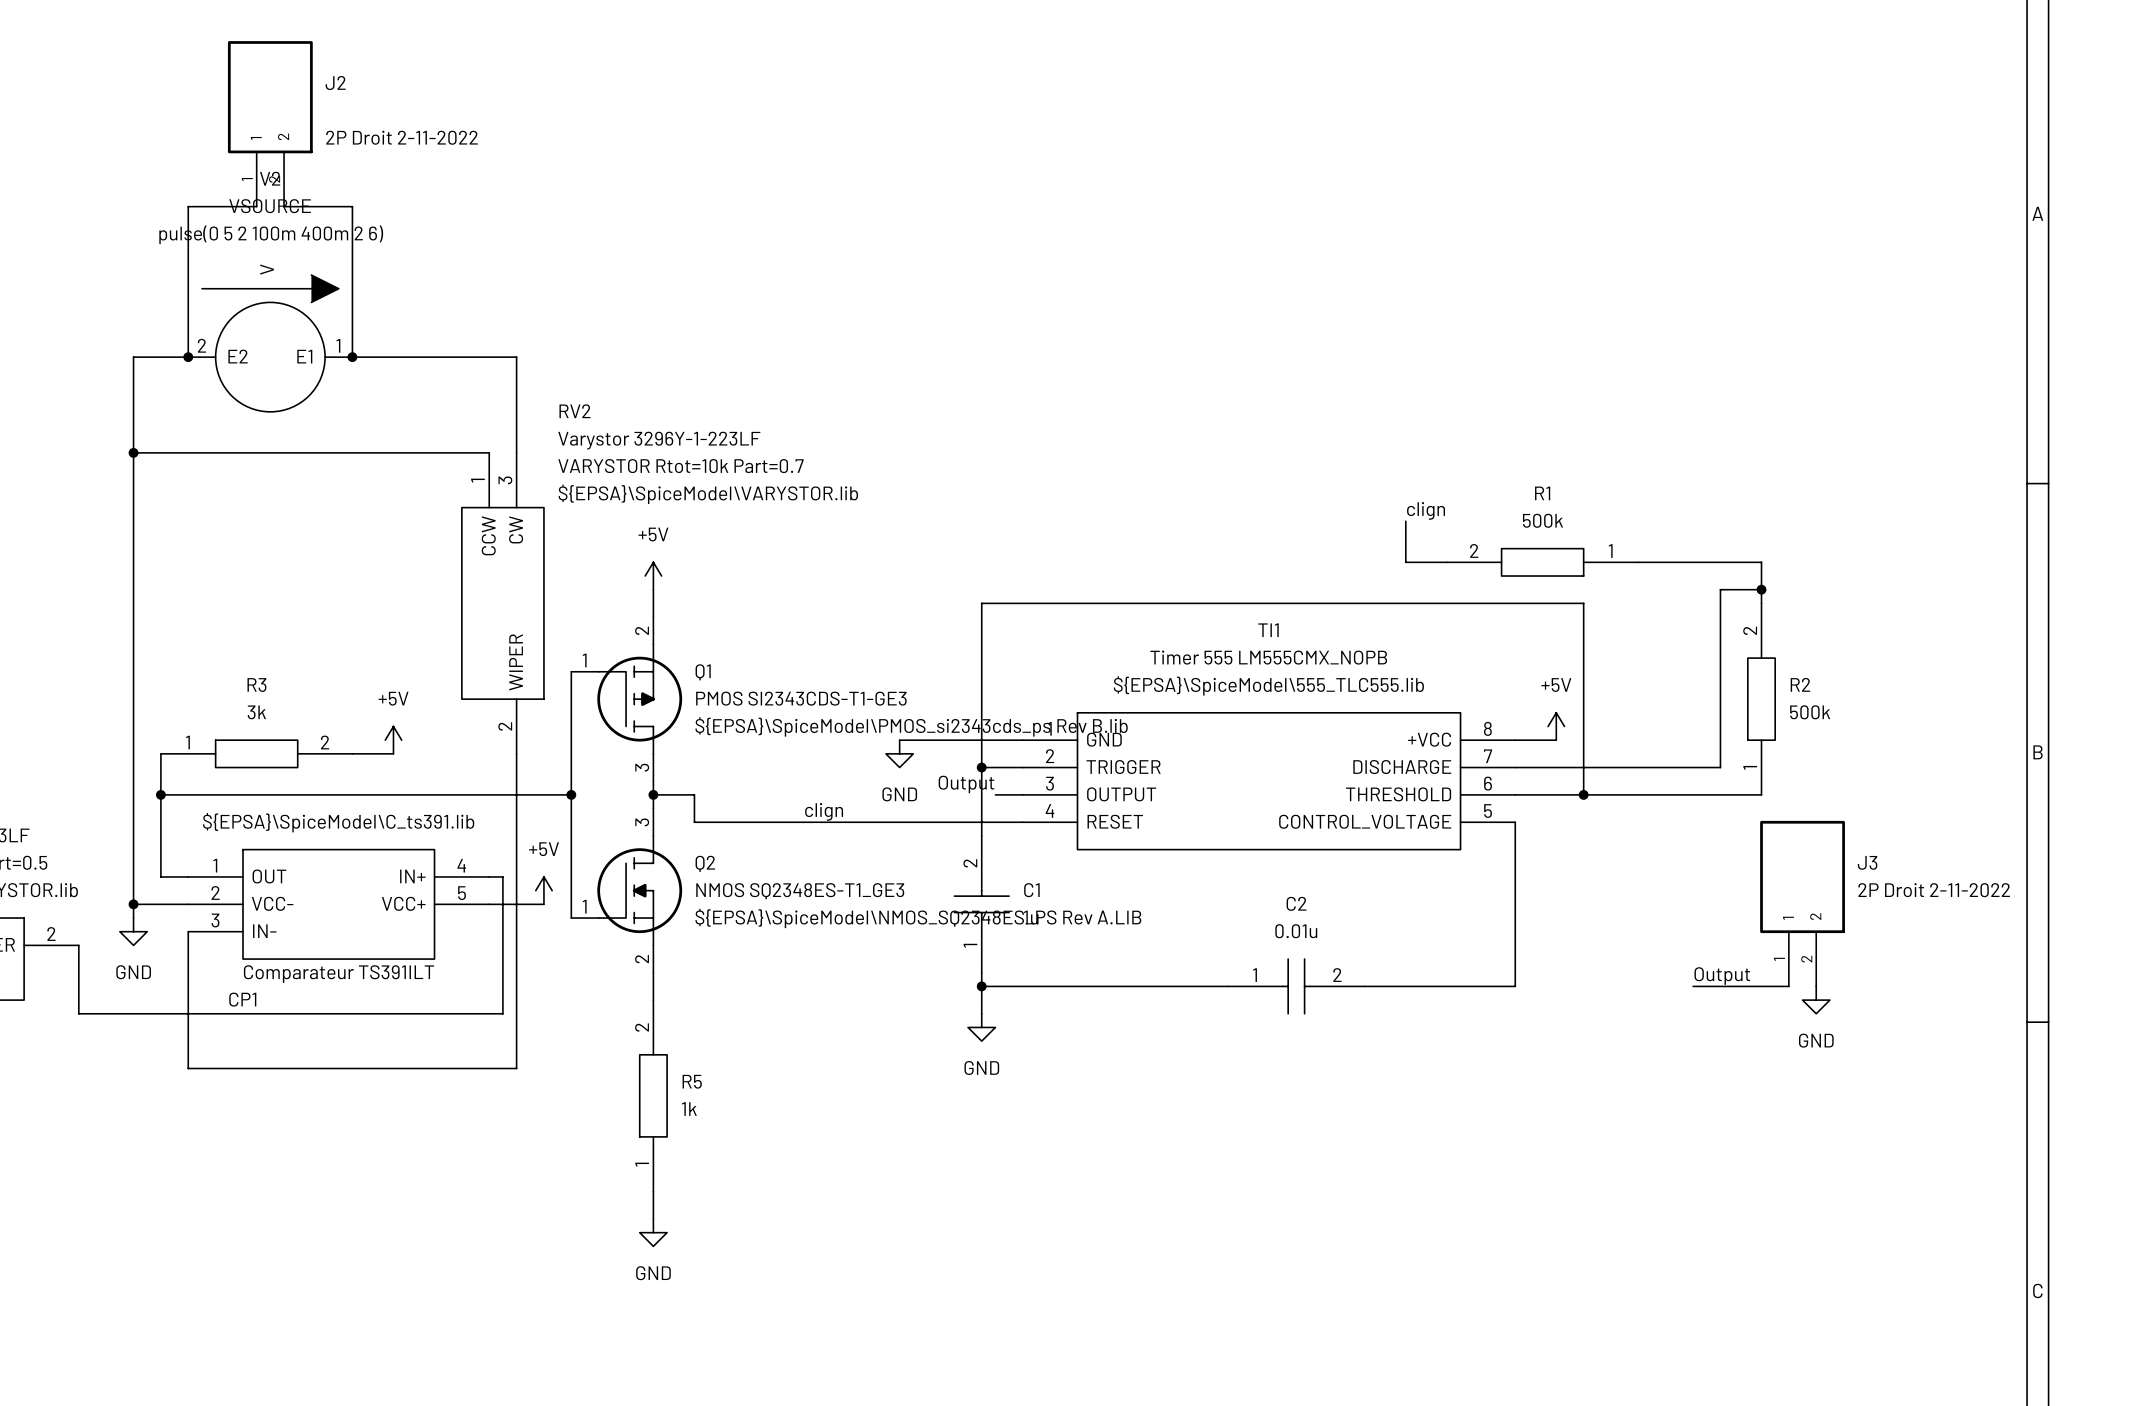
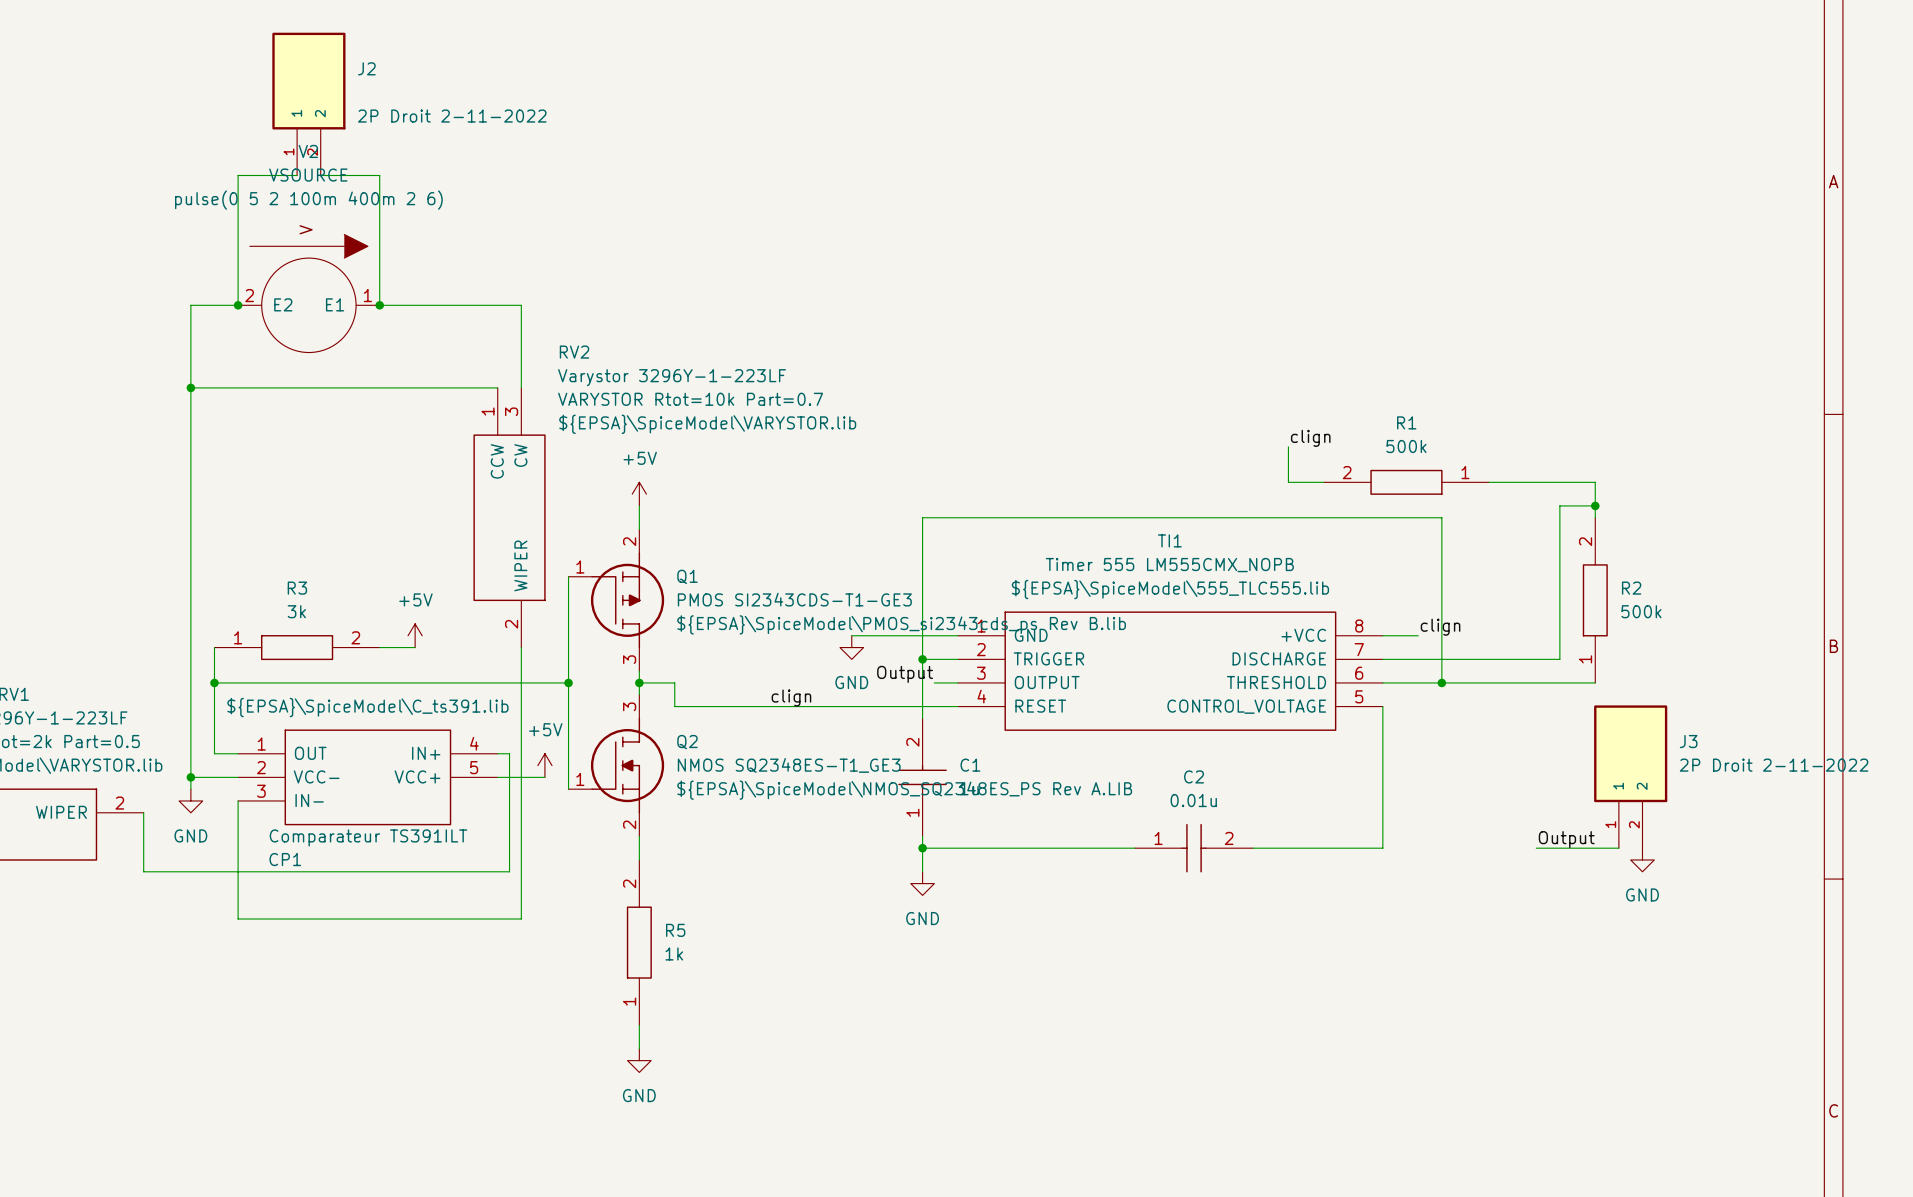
power symbol: +5V (1556, 726) -> none
label: none -> clign (1440, 627)

